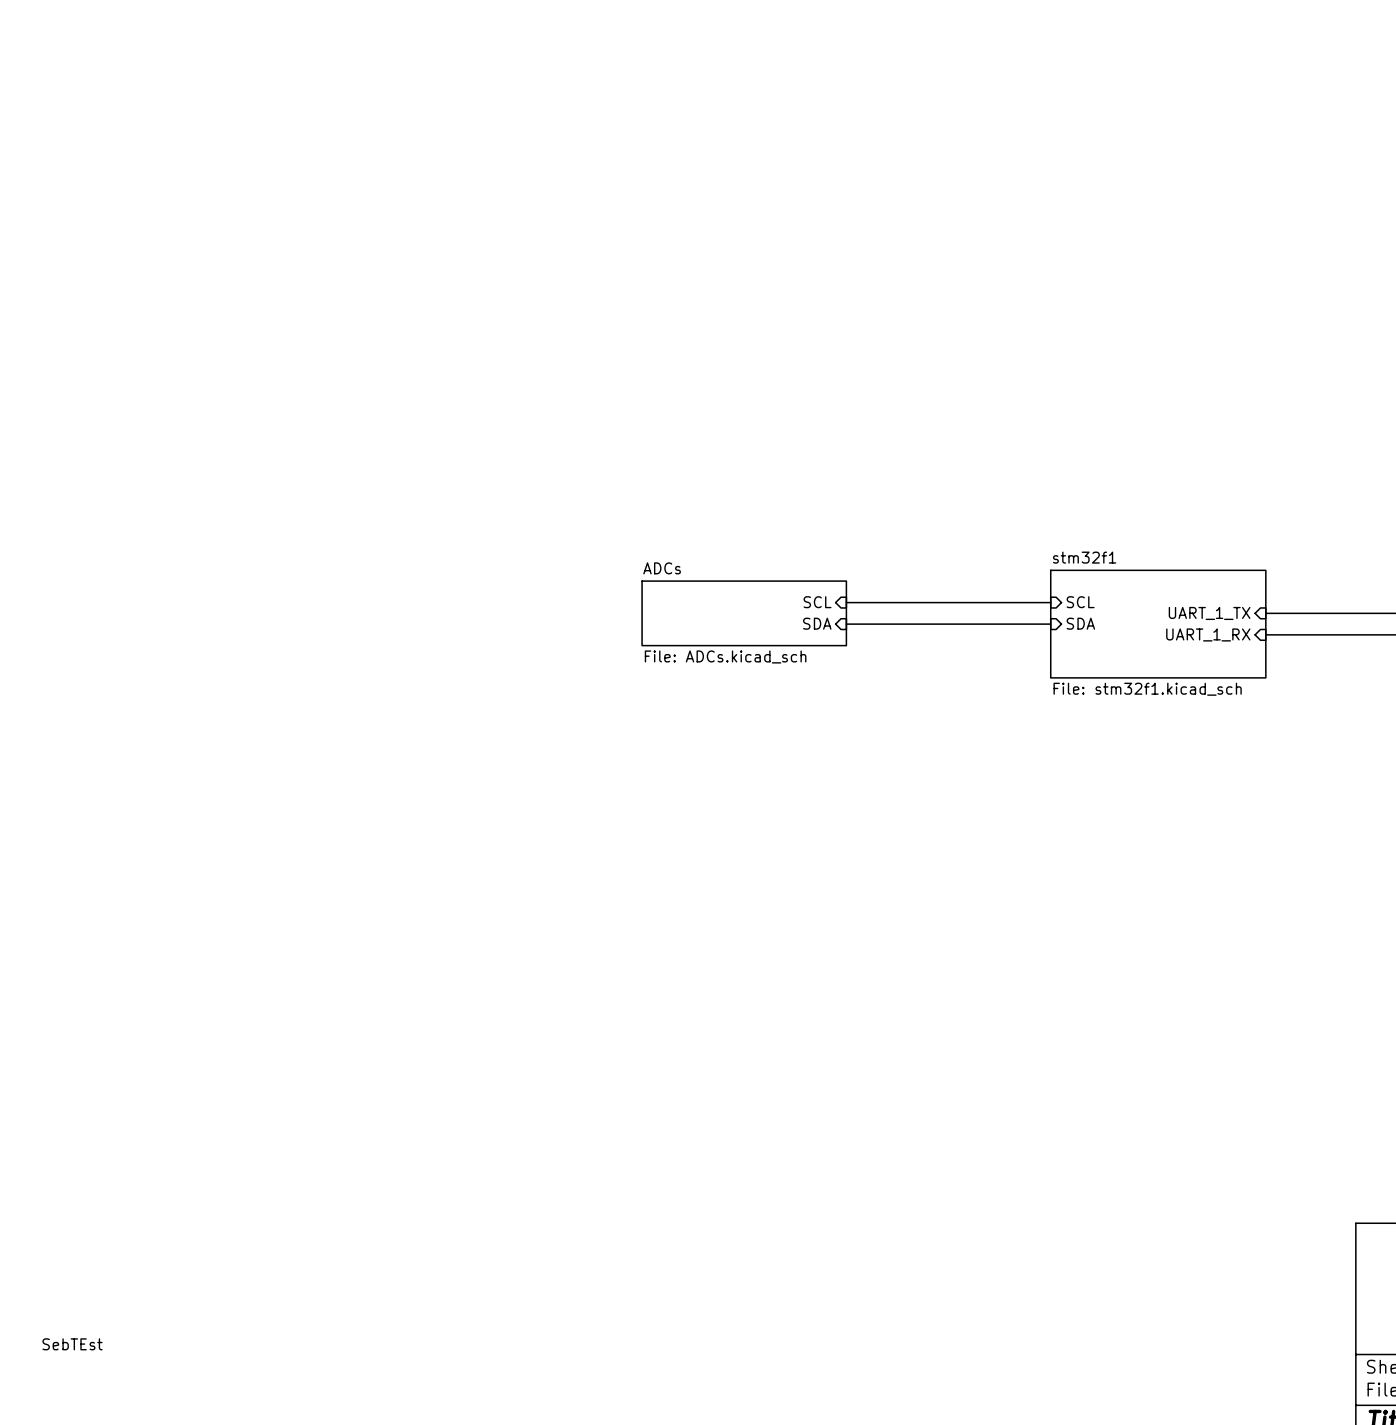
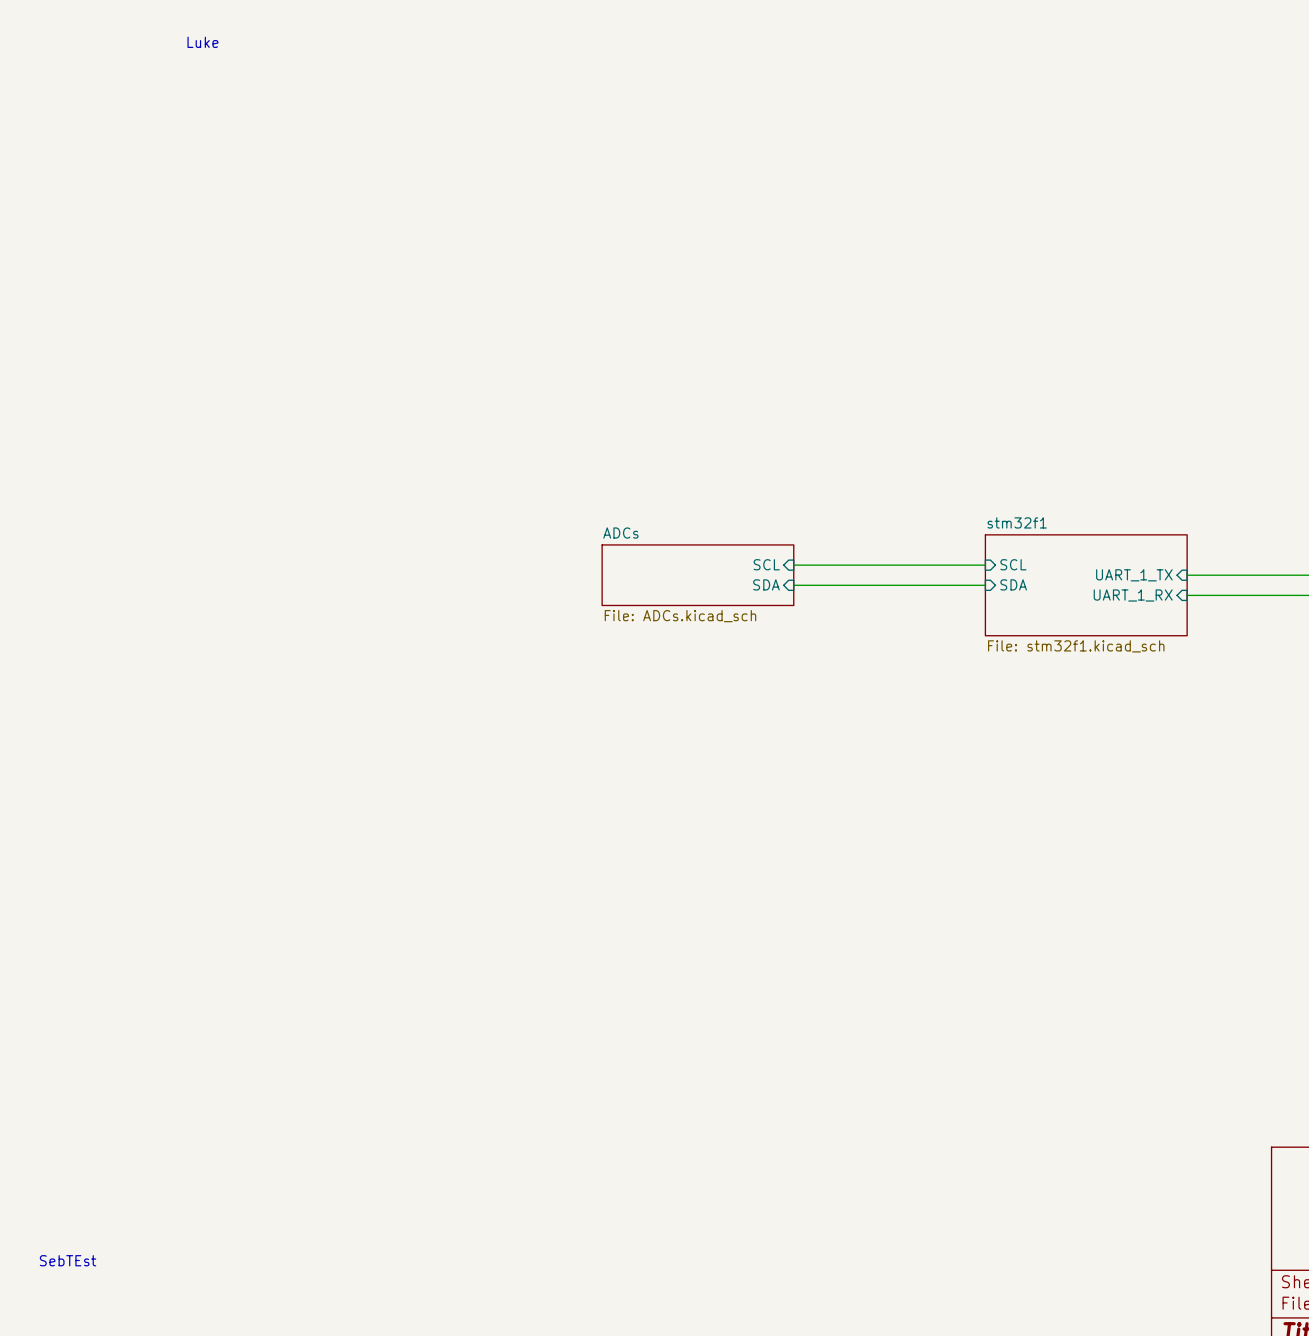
text: none -> Luke (202, 42)

